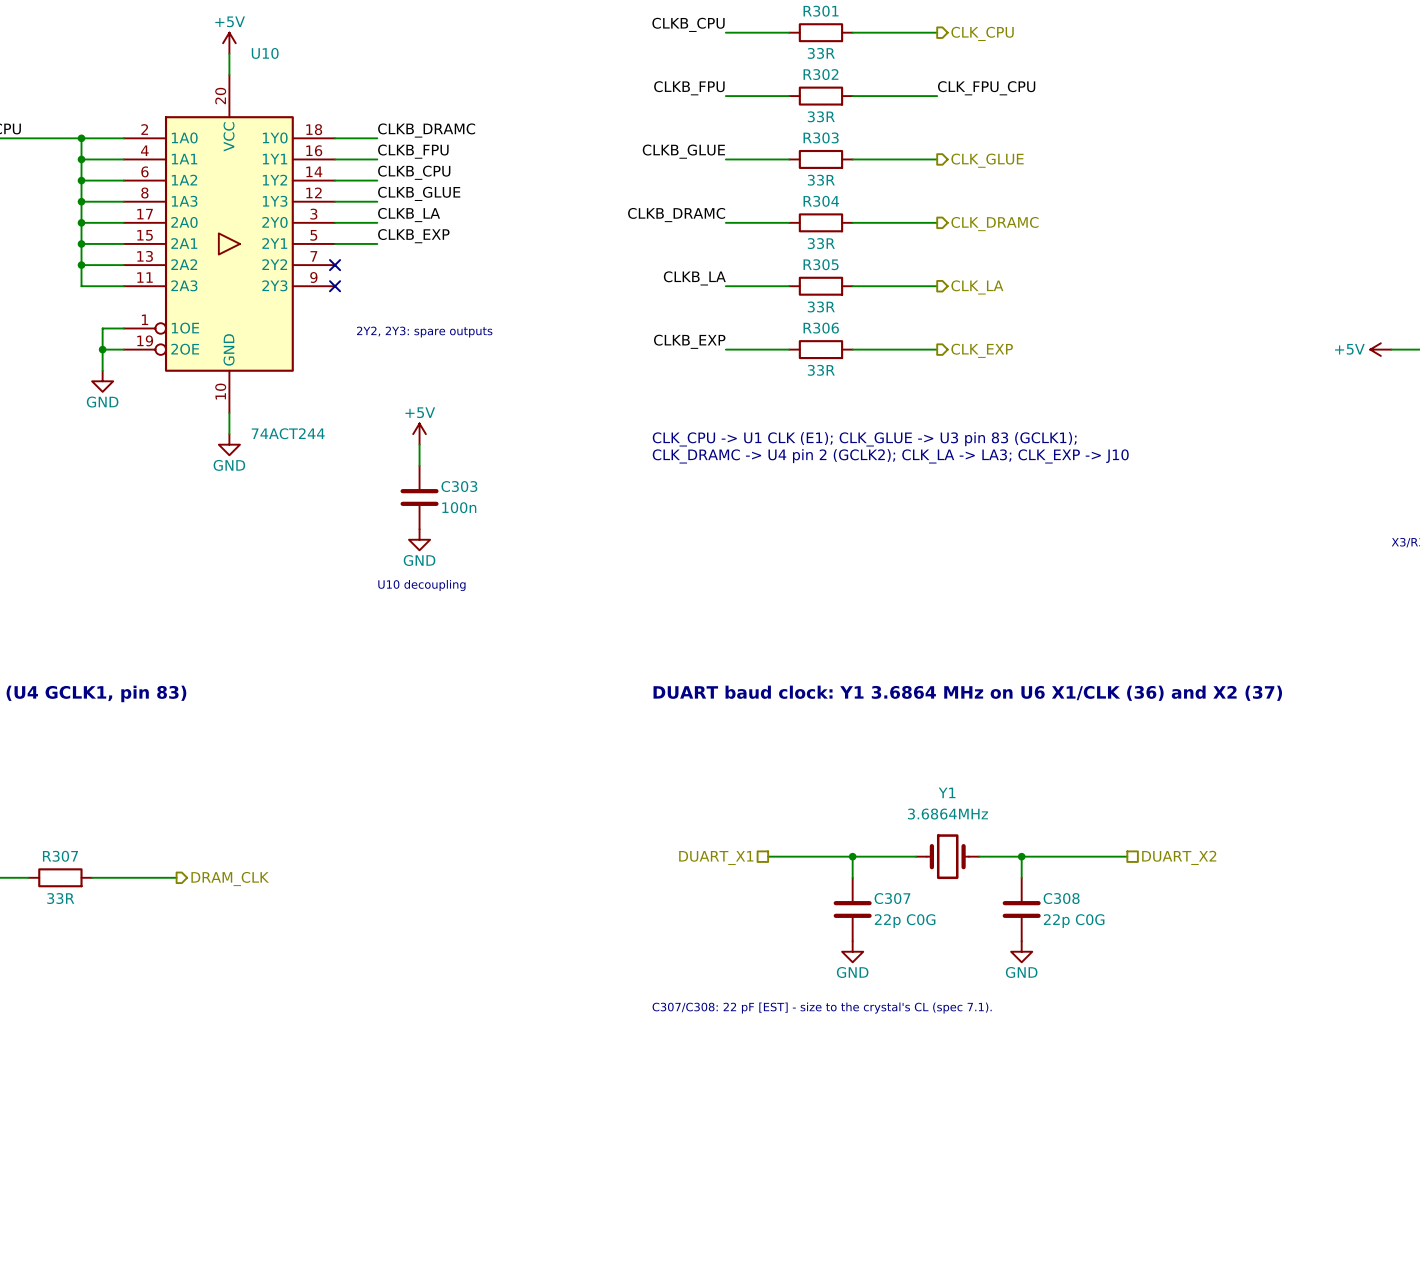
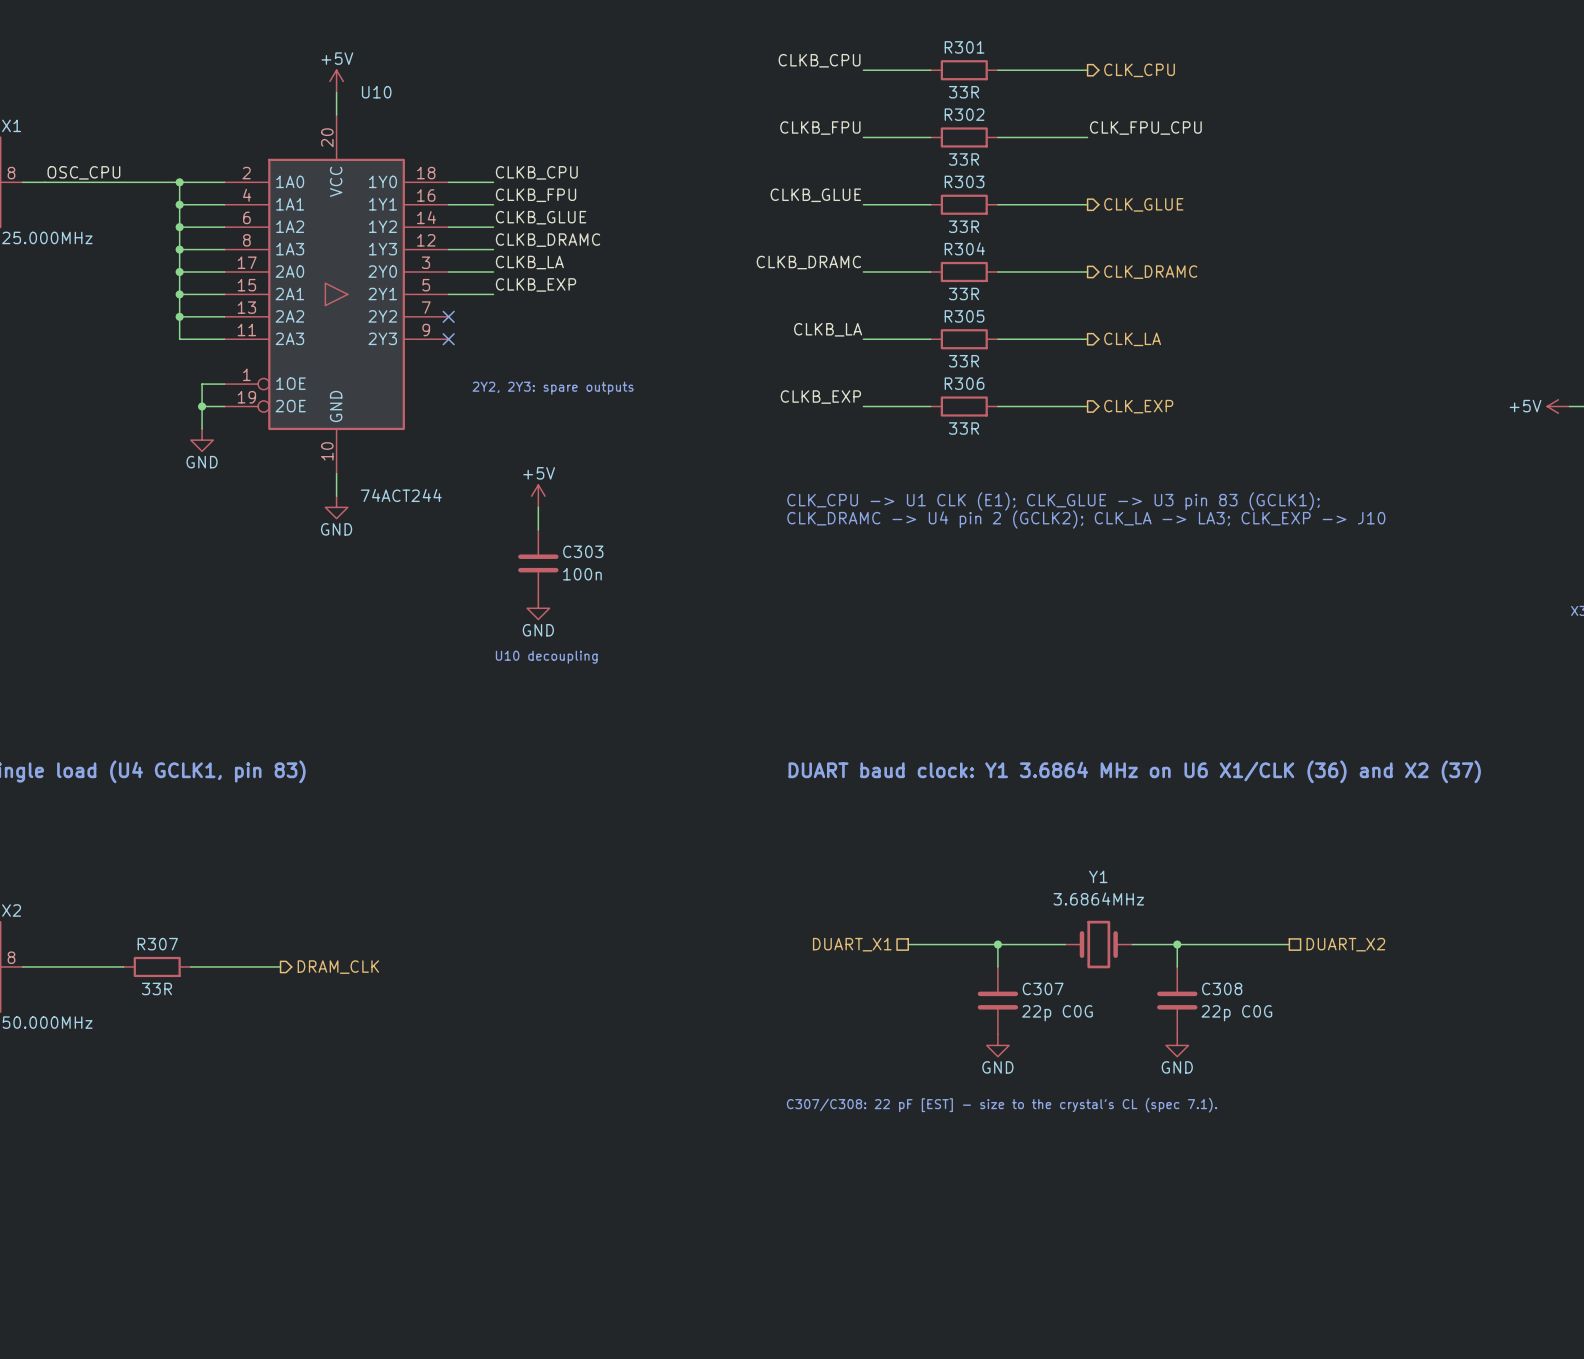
label: CLKB_DRAMC (426, 130) -> CLKB_CPU (536, 172)
label: CLKB_CPU (414, 172) -> CLKB_GLUE (541, 217)
label: CLKB_GLUE (419, 193) -> CLKB_DRAMC (548, 240)

